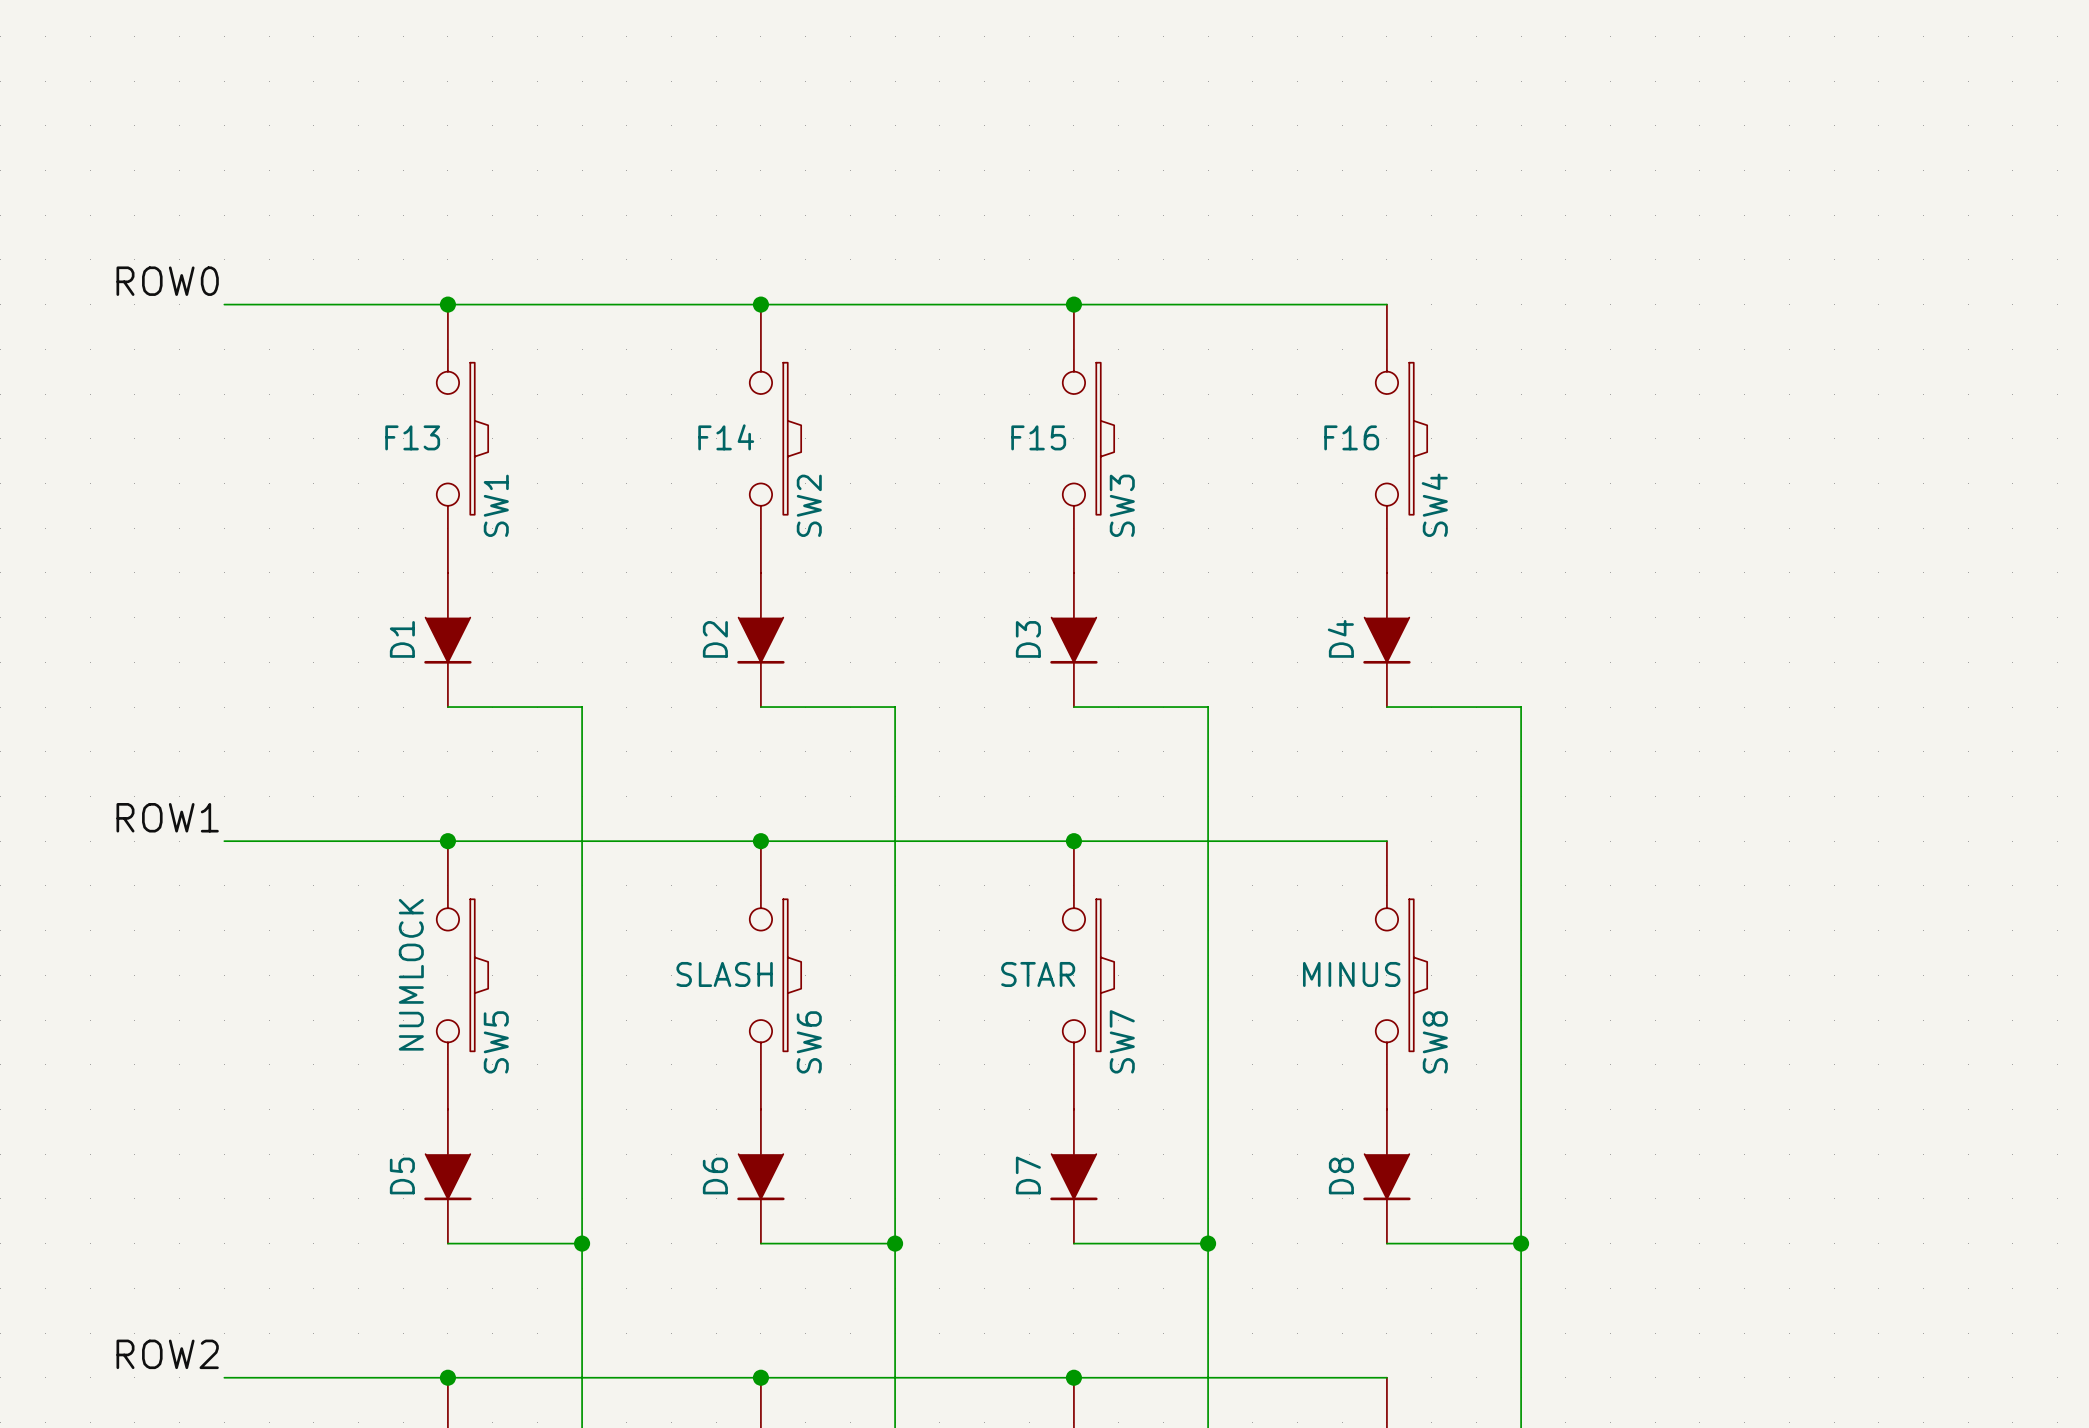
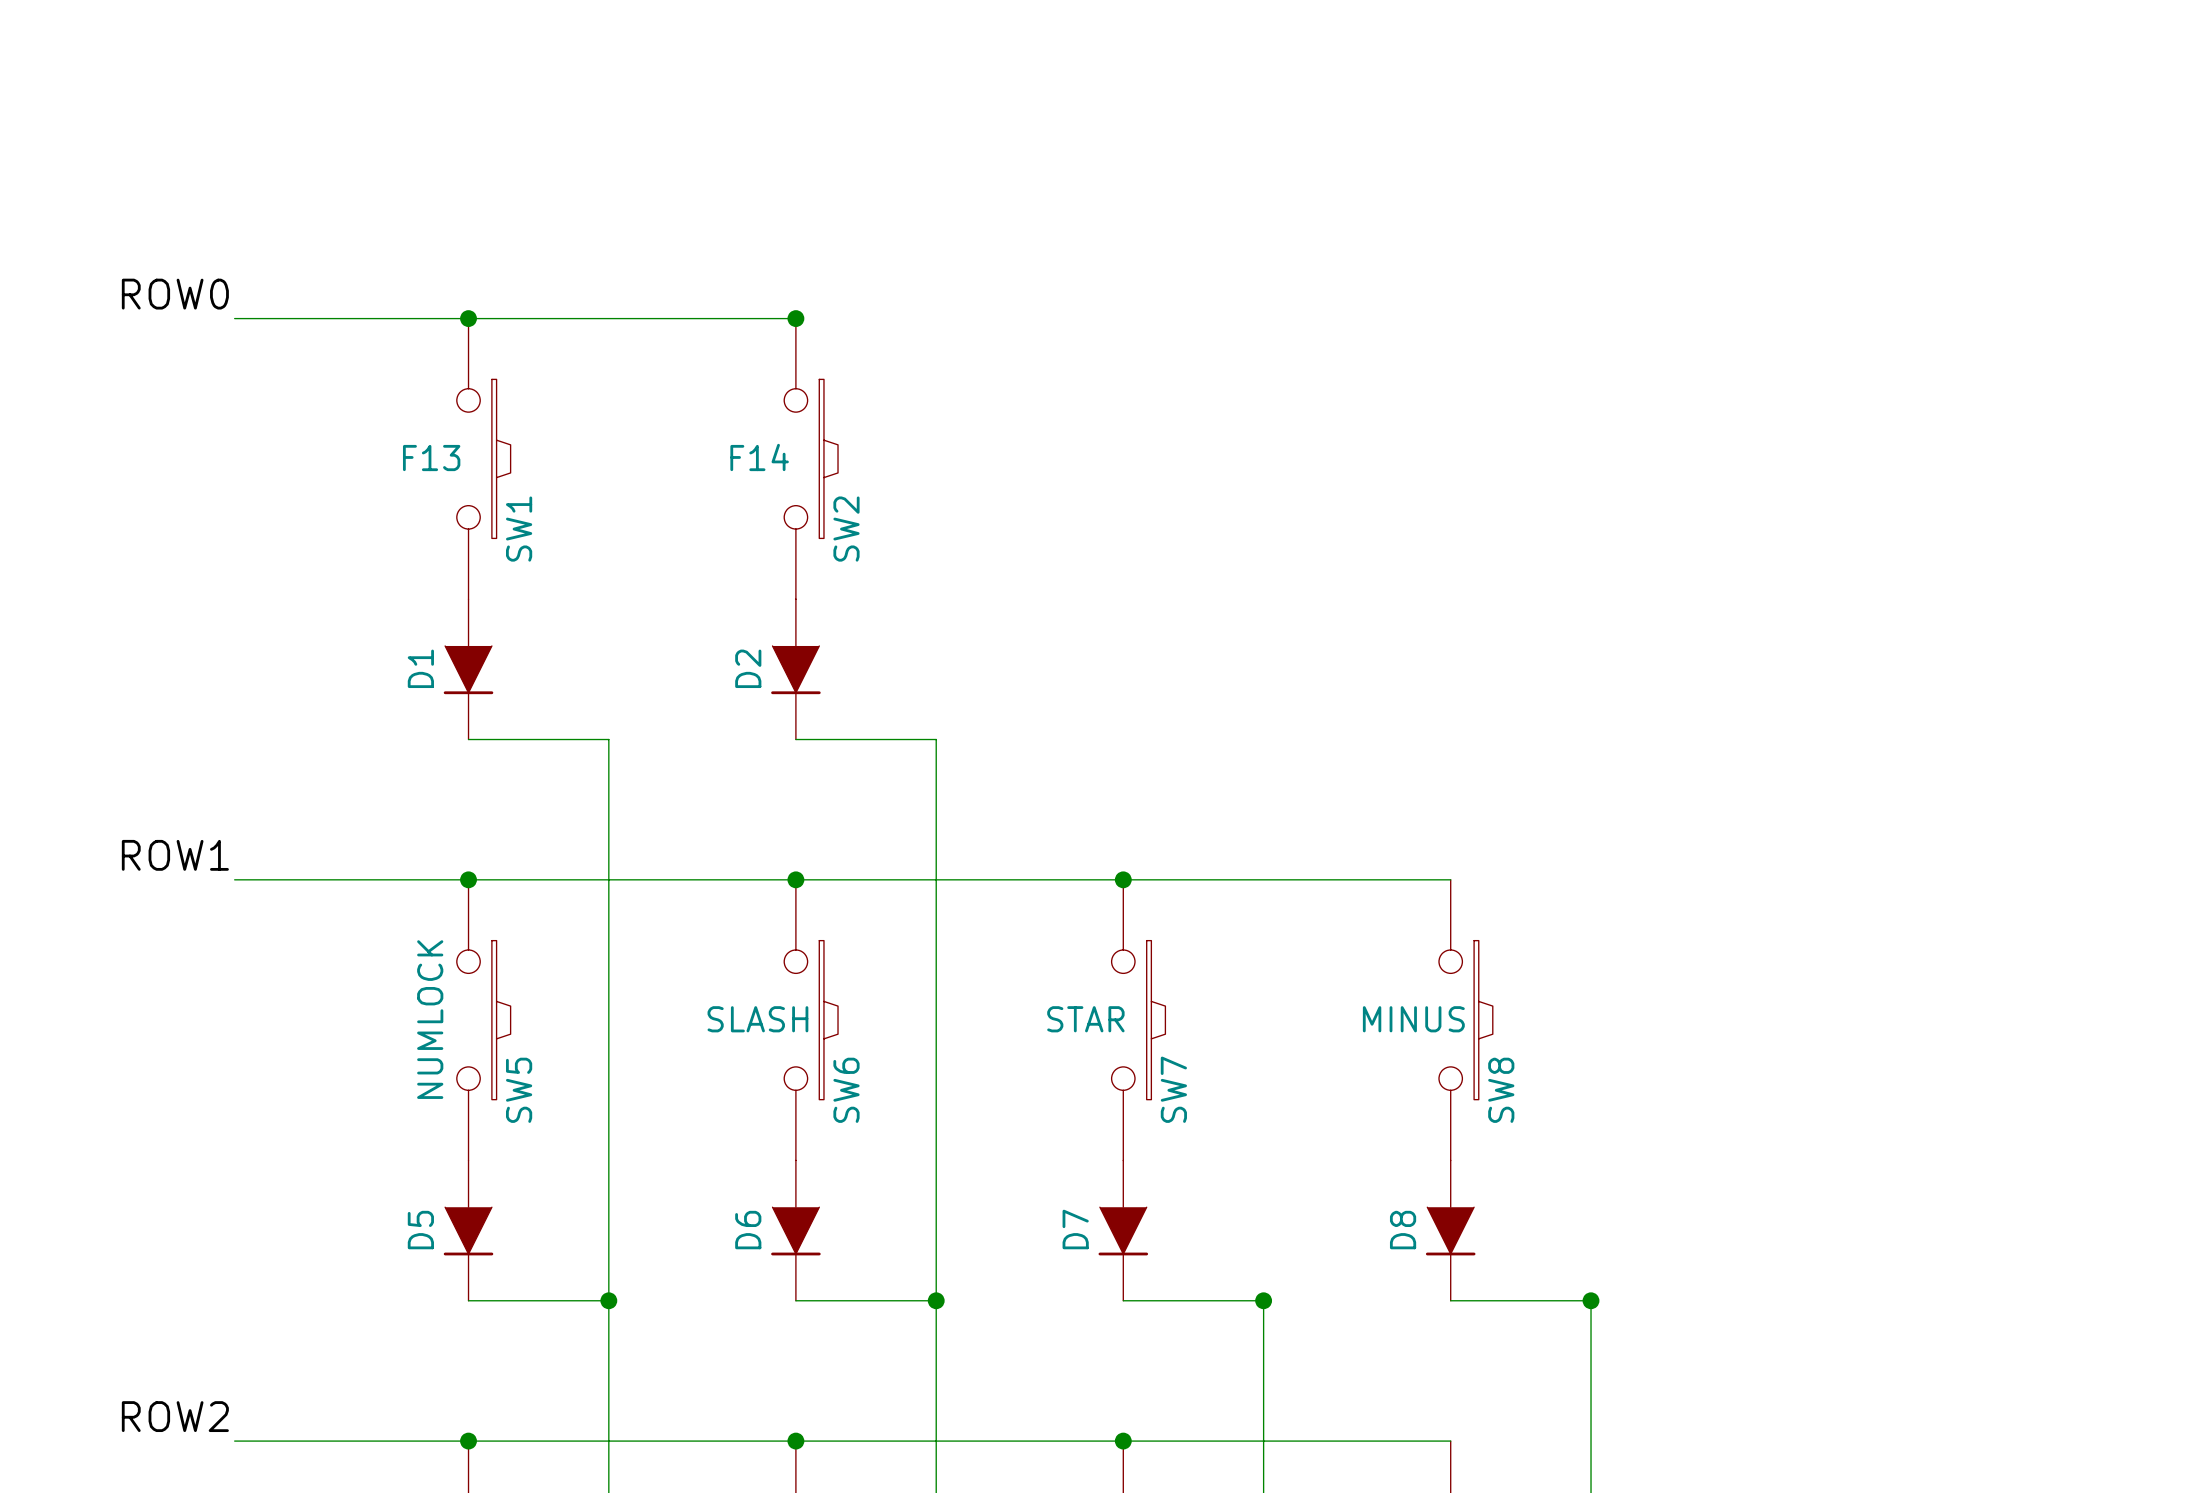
wire: (760, 304) (1386, 304) -> none
junction: (1073, 304) -> none
SW3: F15 (1088, 438) -> none
SW4: F16 (1401, 438) -> none
D3: (1073, 639) -> none
D4: (1386, 639) -> none
wire: (1073, 707) (1208, 707) (1208, 1243) -> none
wire: (1386, 707) (1521, 707) (1521, 1243) -> none

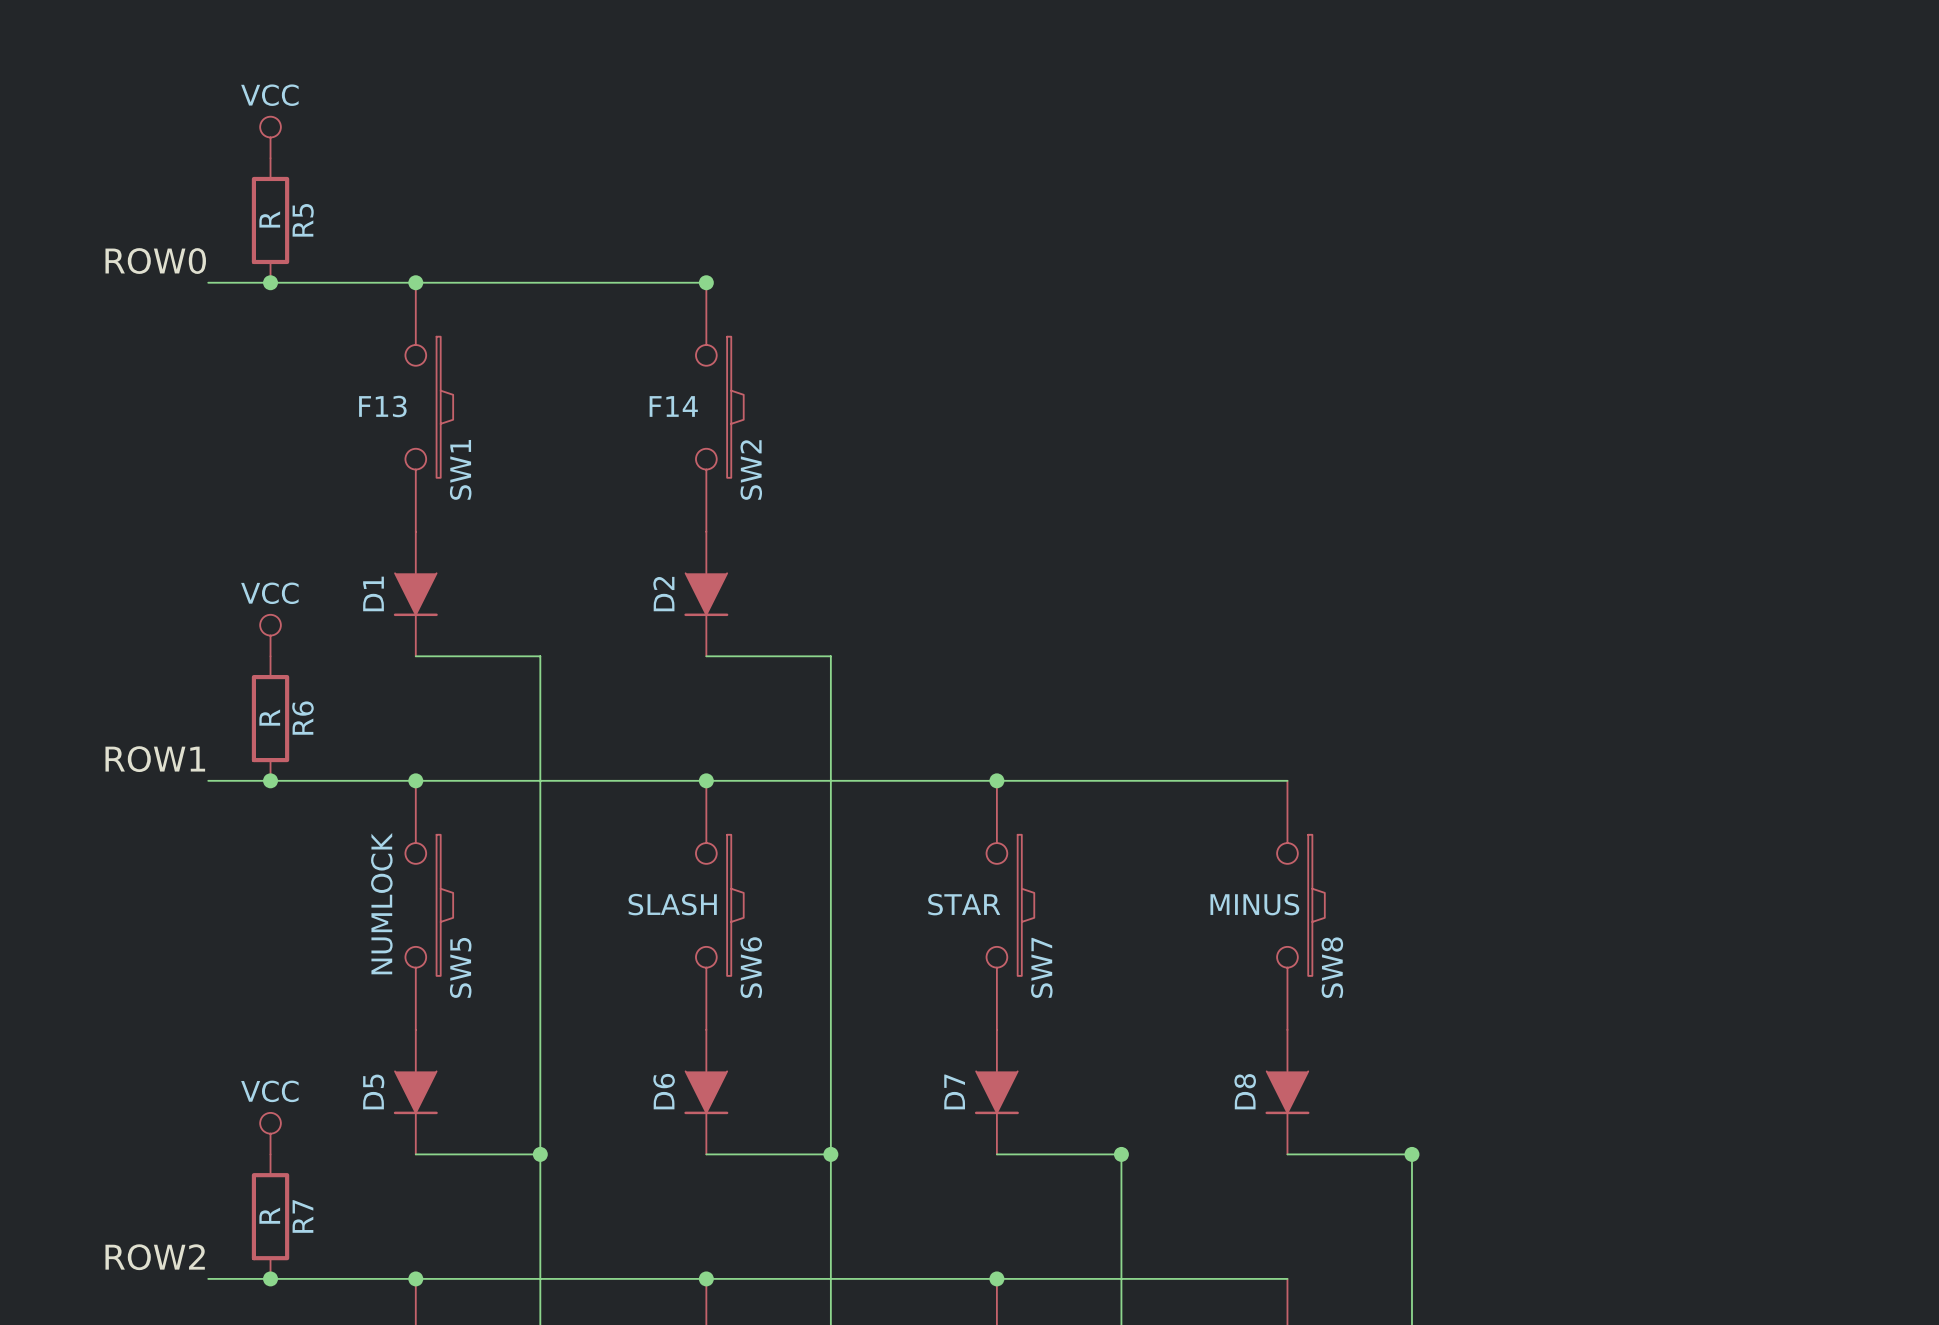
power symbol: none -> VCC (270, 137)
R5: none -> R (270, 220)
junction: none -> (270, 282)
power symbol: none -> VCC (270, 635)
R6: none -> R (270, 718)
junction: none -> (270, 780)
power symbol: none -> VCC (270, 1133)
R7: none -> R (270, 1216)
junction: none -> (270, 1278)

